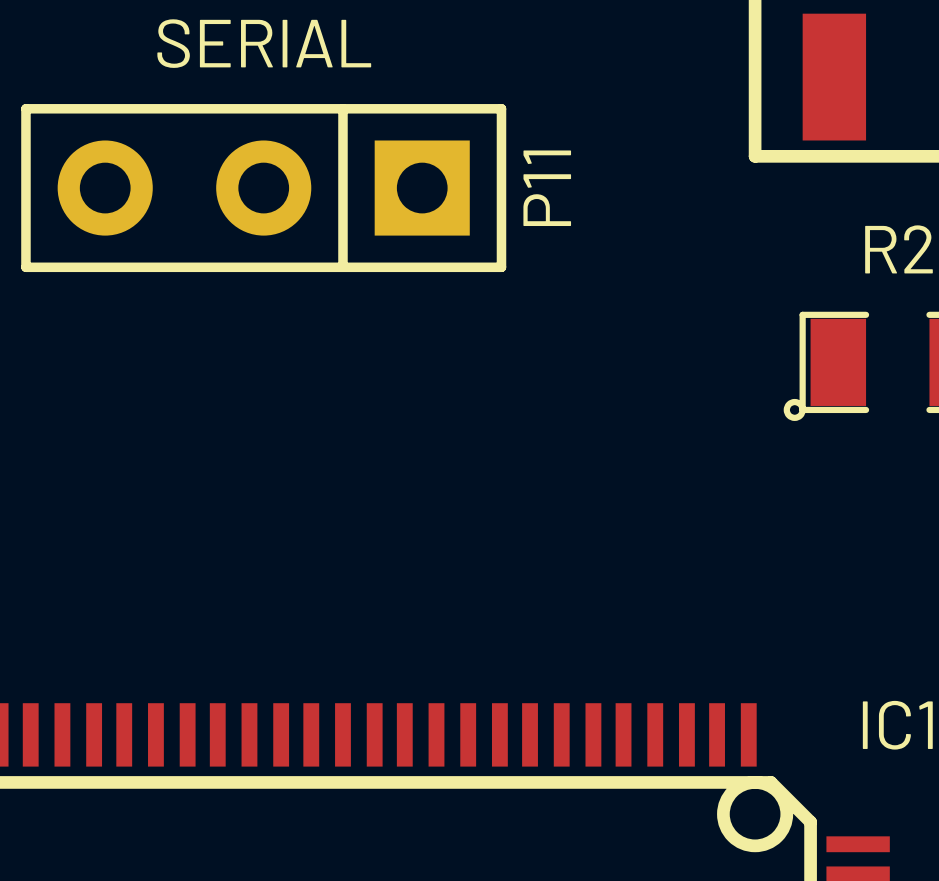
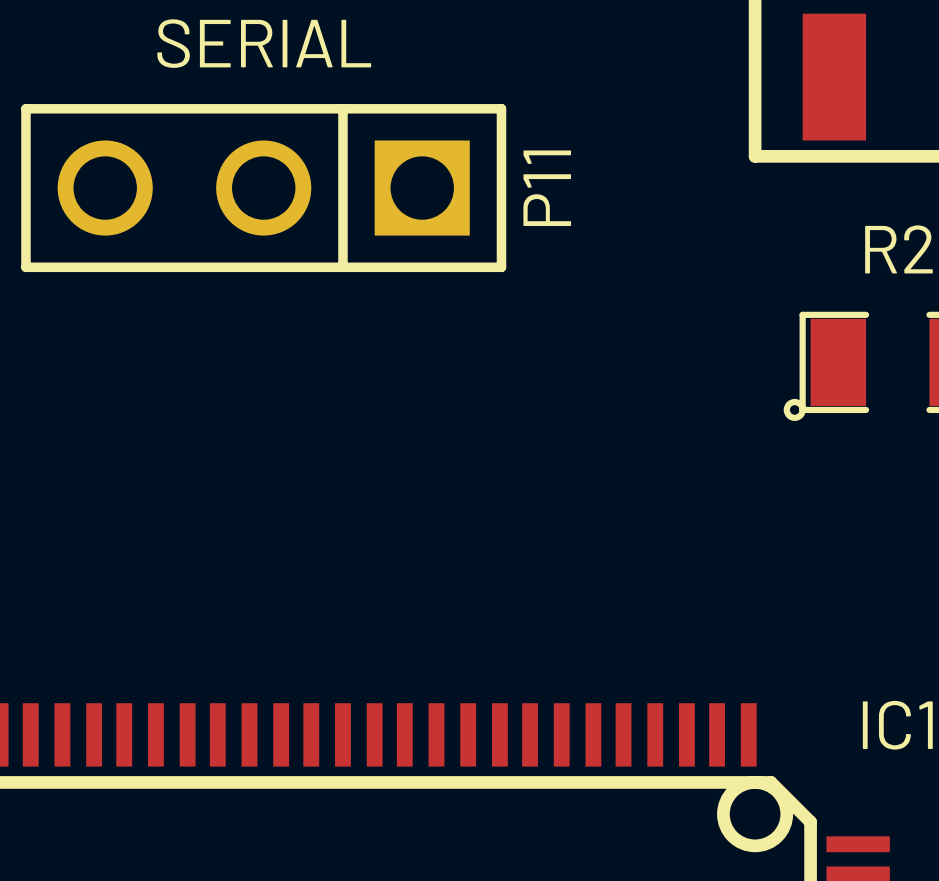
P11 footprint: [21, 104, 507, 273] -> [21, 104, 507, 273]

